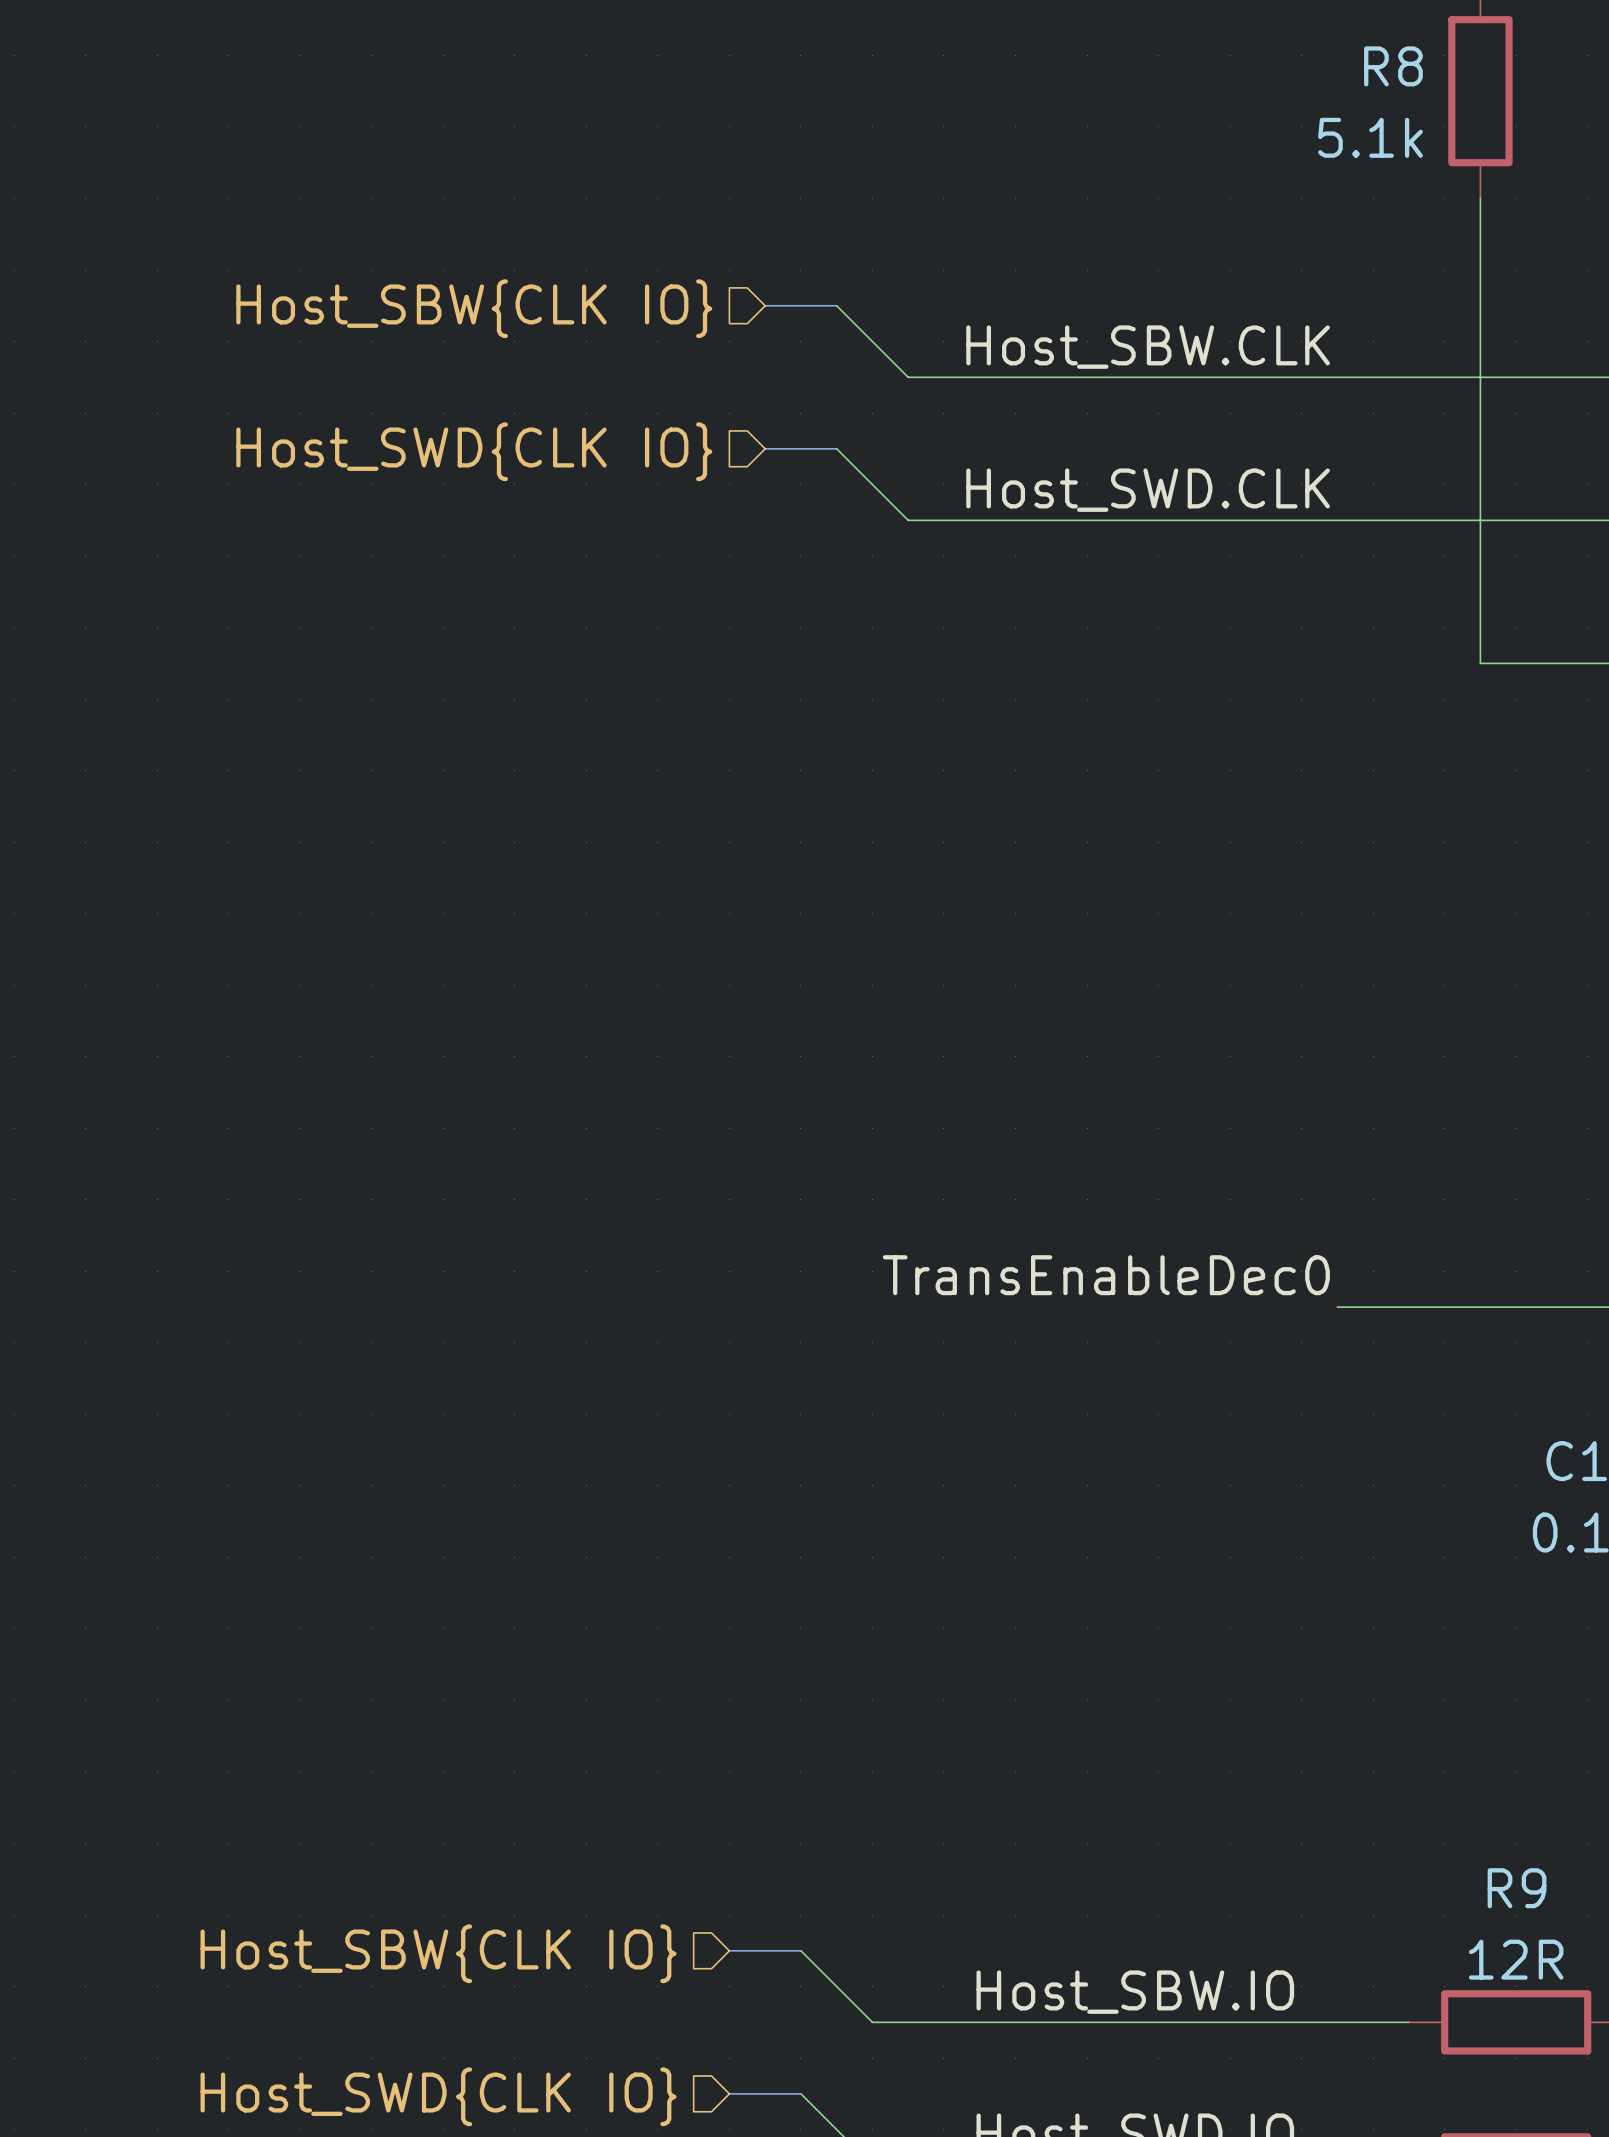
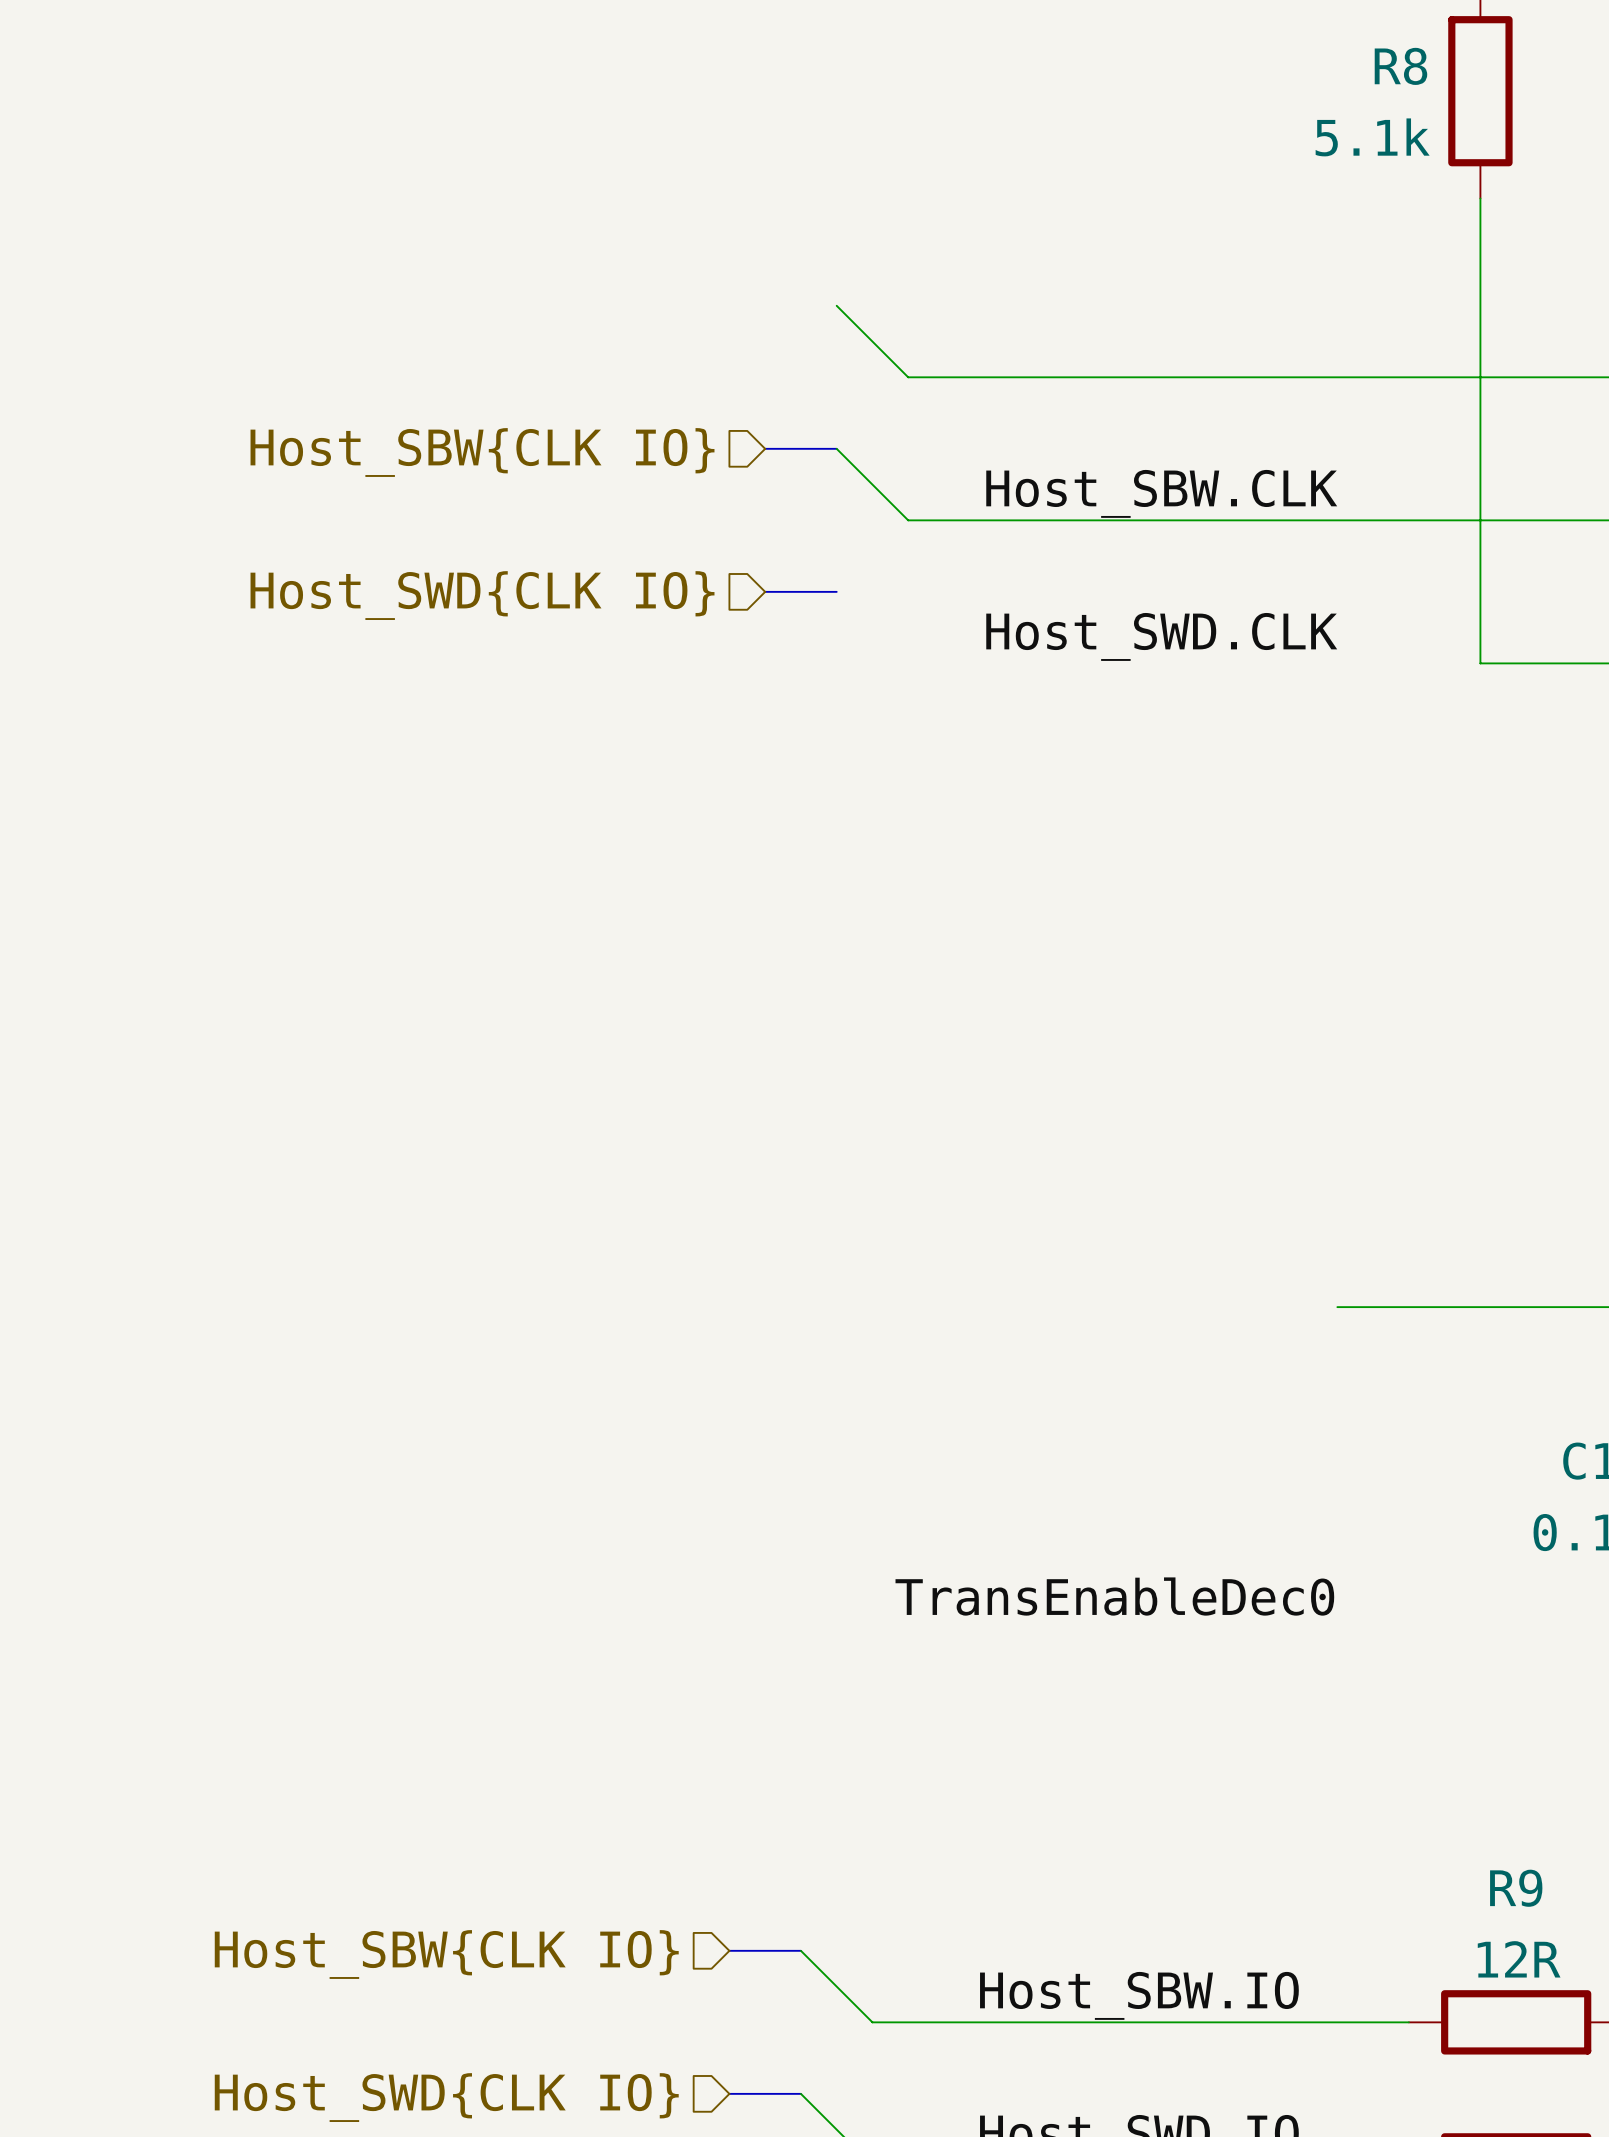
bus: (765, 305) (836, 305) -> (765, 591) (836, 591)
hierarchical label: Host_SBW{CLK IO} (474, 308) -> none
label: Host_SBW.CLK (1148, 347) -> none
hierarchical label: Host_SWD{CLK IO} (474, 451) -> Host_SBW{CLK IO} (482, 452)
label: Host_SWD.CLK (1148, 490) -> Host_SBW.CLK (1161, 493)
hierarchical label: none -> Host_SWD{CLK IO} (482, 595)
label: none -> Host_SWD.CLK (1161, 636)
label position: TransEnableDec0 (1106, 1275) -> TransEnableDec0 (1114, 1596)

